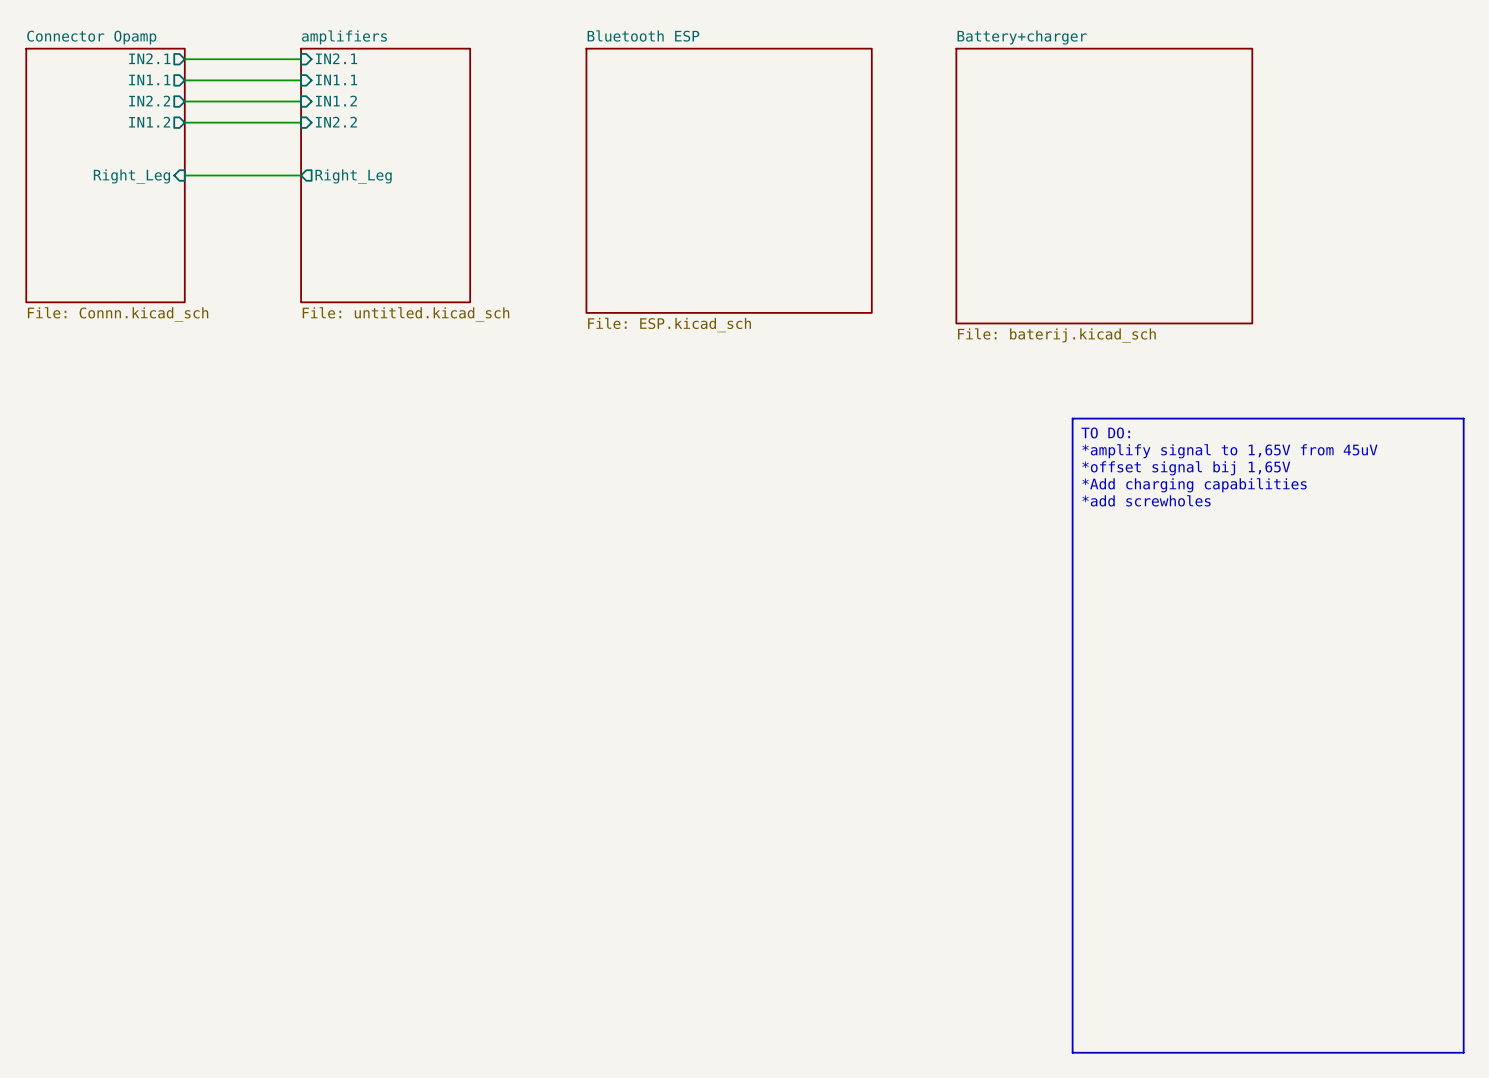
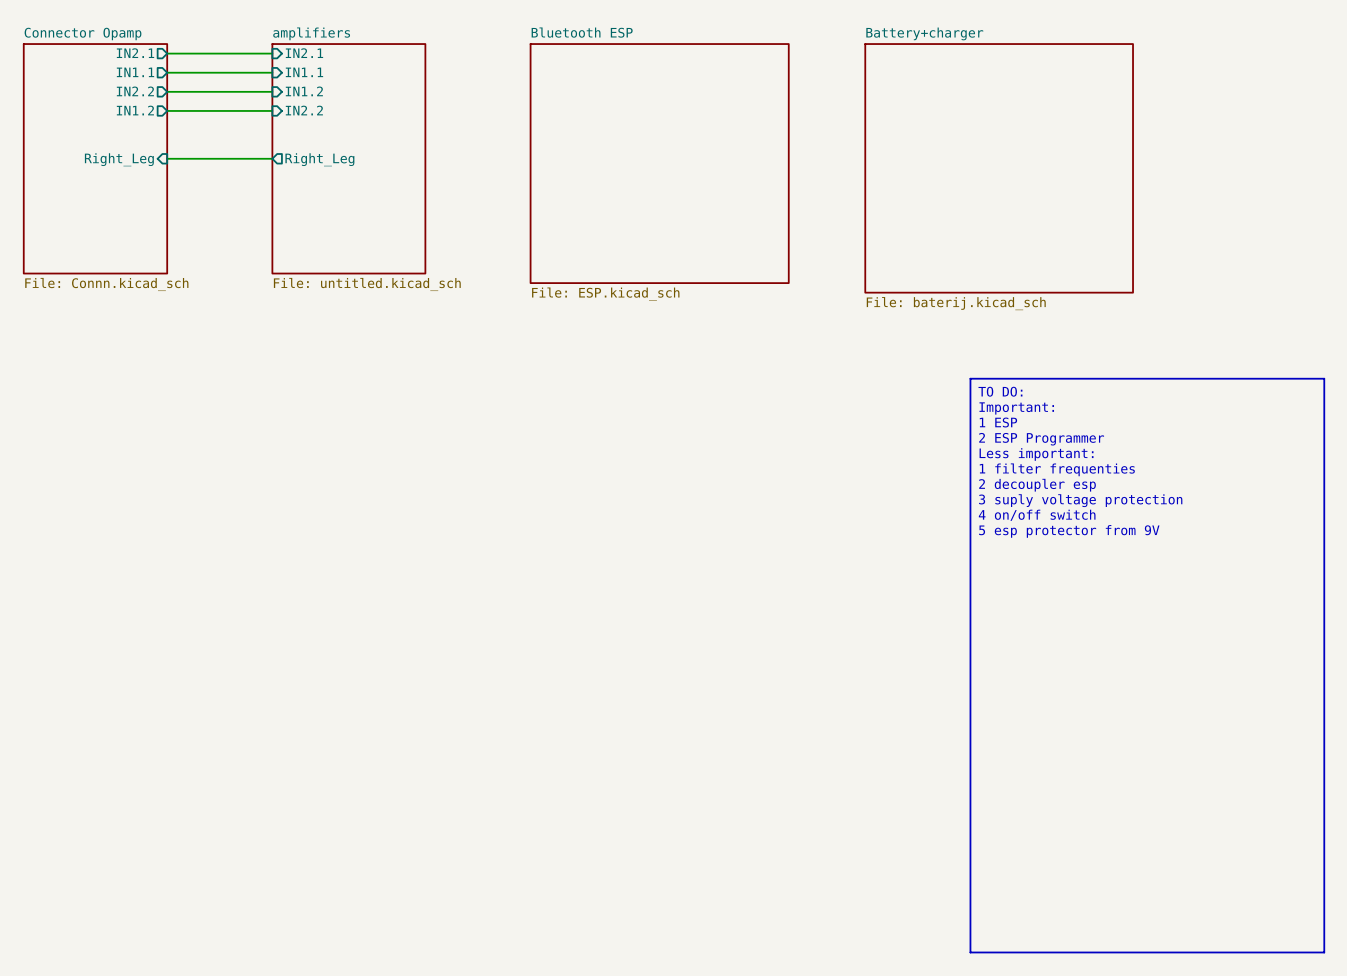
text: *amplify signal to 1,65V from 45uV (1229, 451) -> Important: (1016, 408)
text: *offset signal bij 1,65V (1186, 468) -> 1 ESP (998, 422)
text: *Add charging capabilities (1194, 485) -> 2 ESP Programmer (1041, 439)
text: *add screwholes (1146, 500) -> Less important: (1036, 454)
text: none -> 1 filter frequenties (1057, 469)
text: none -> 2 decoupler esp (1037, 485)
text: none -> 3 suply voltage protection (1080, 500)
text: none -> 4 on/off switch (1037, 515)
text: none -> 5 esp protector from 9V (1069, 531)

